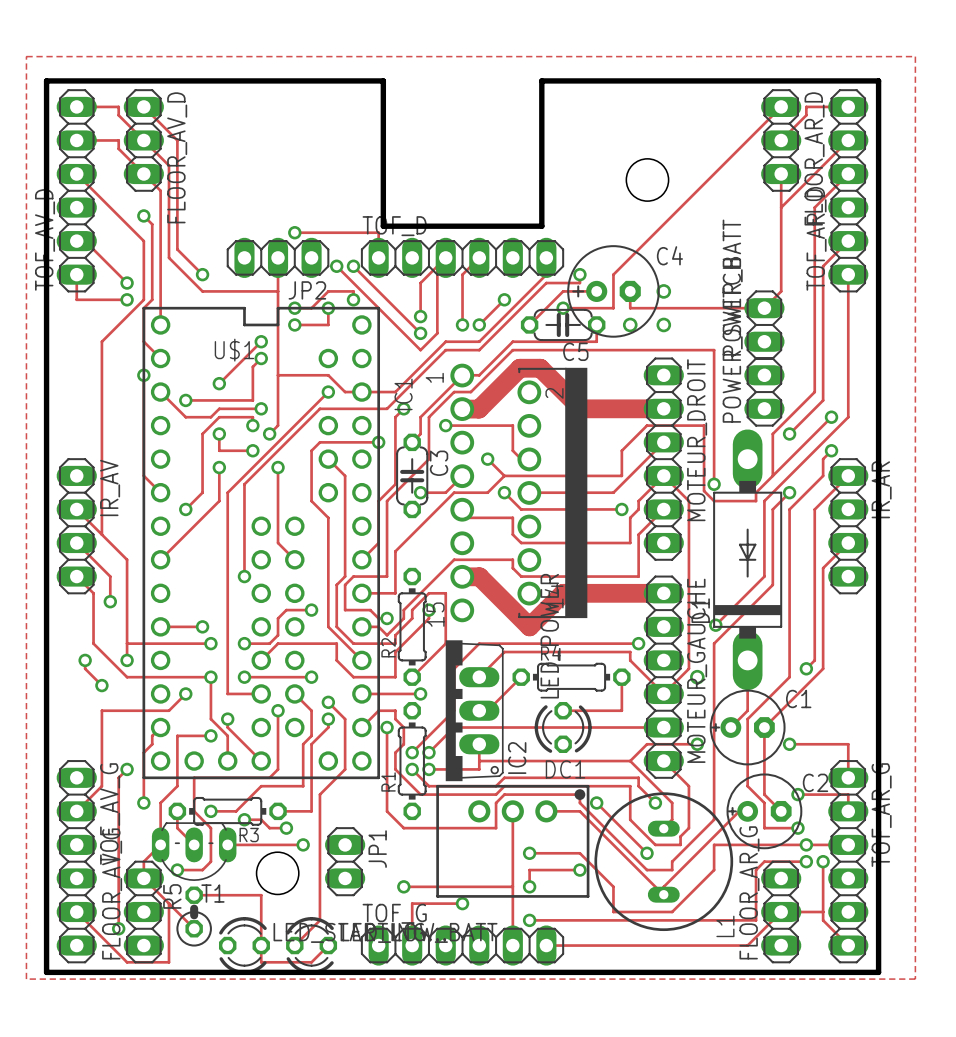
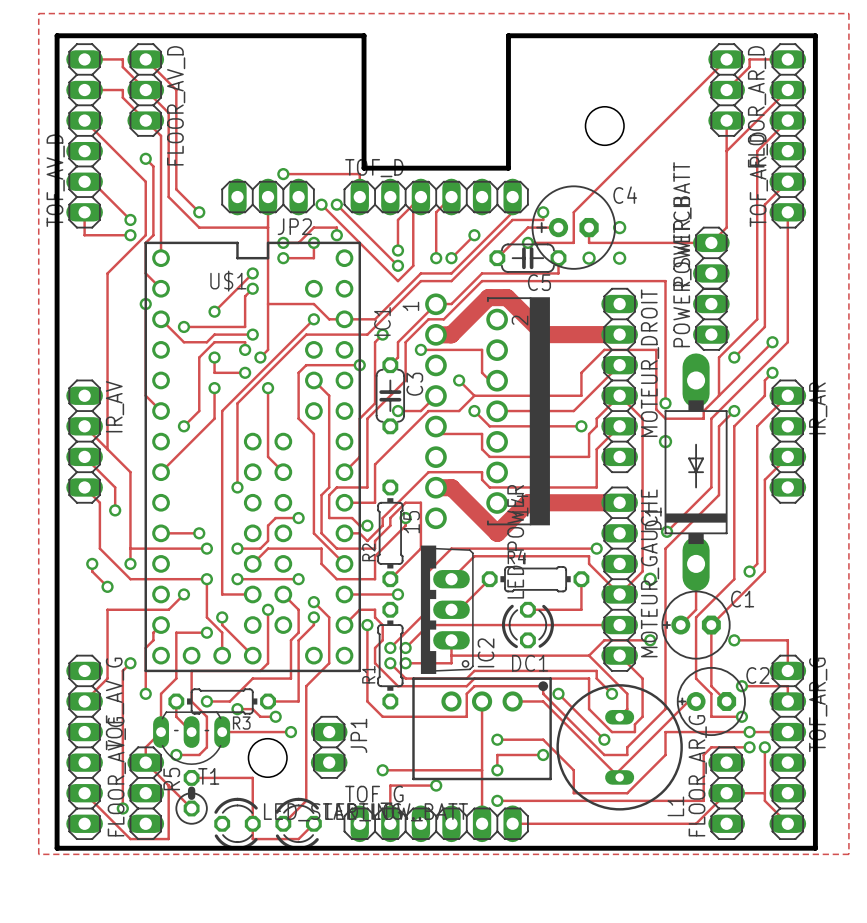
via: none -> (665, 441)

